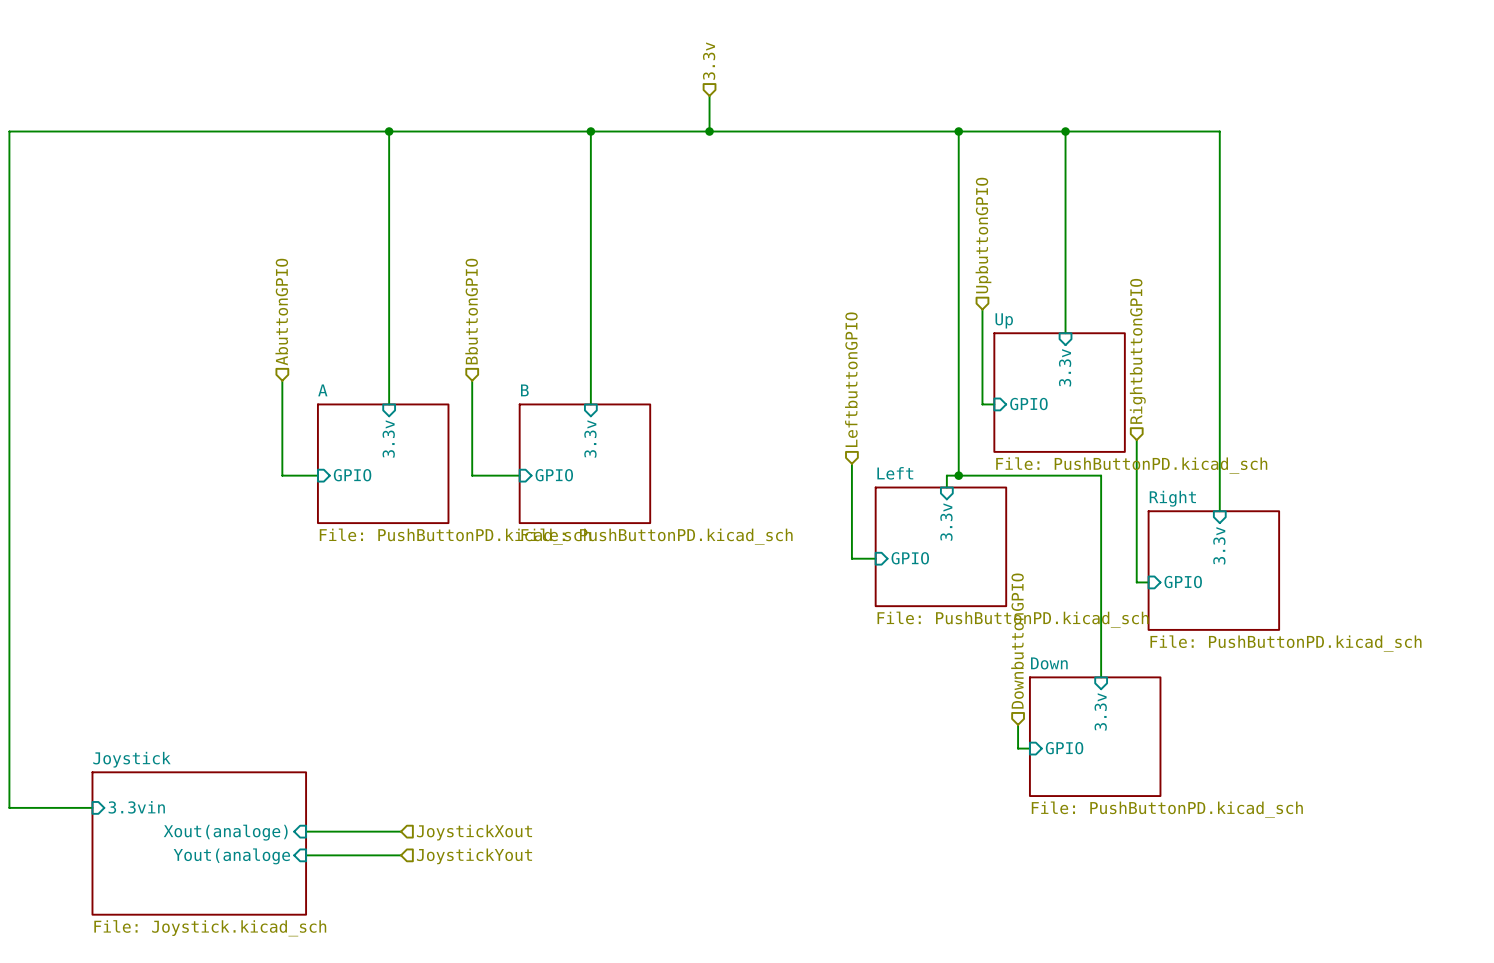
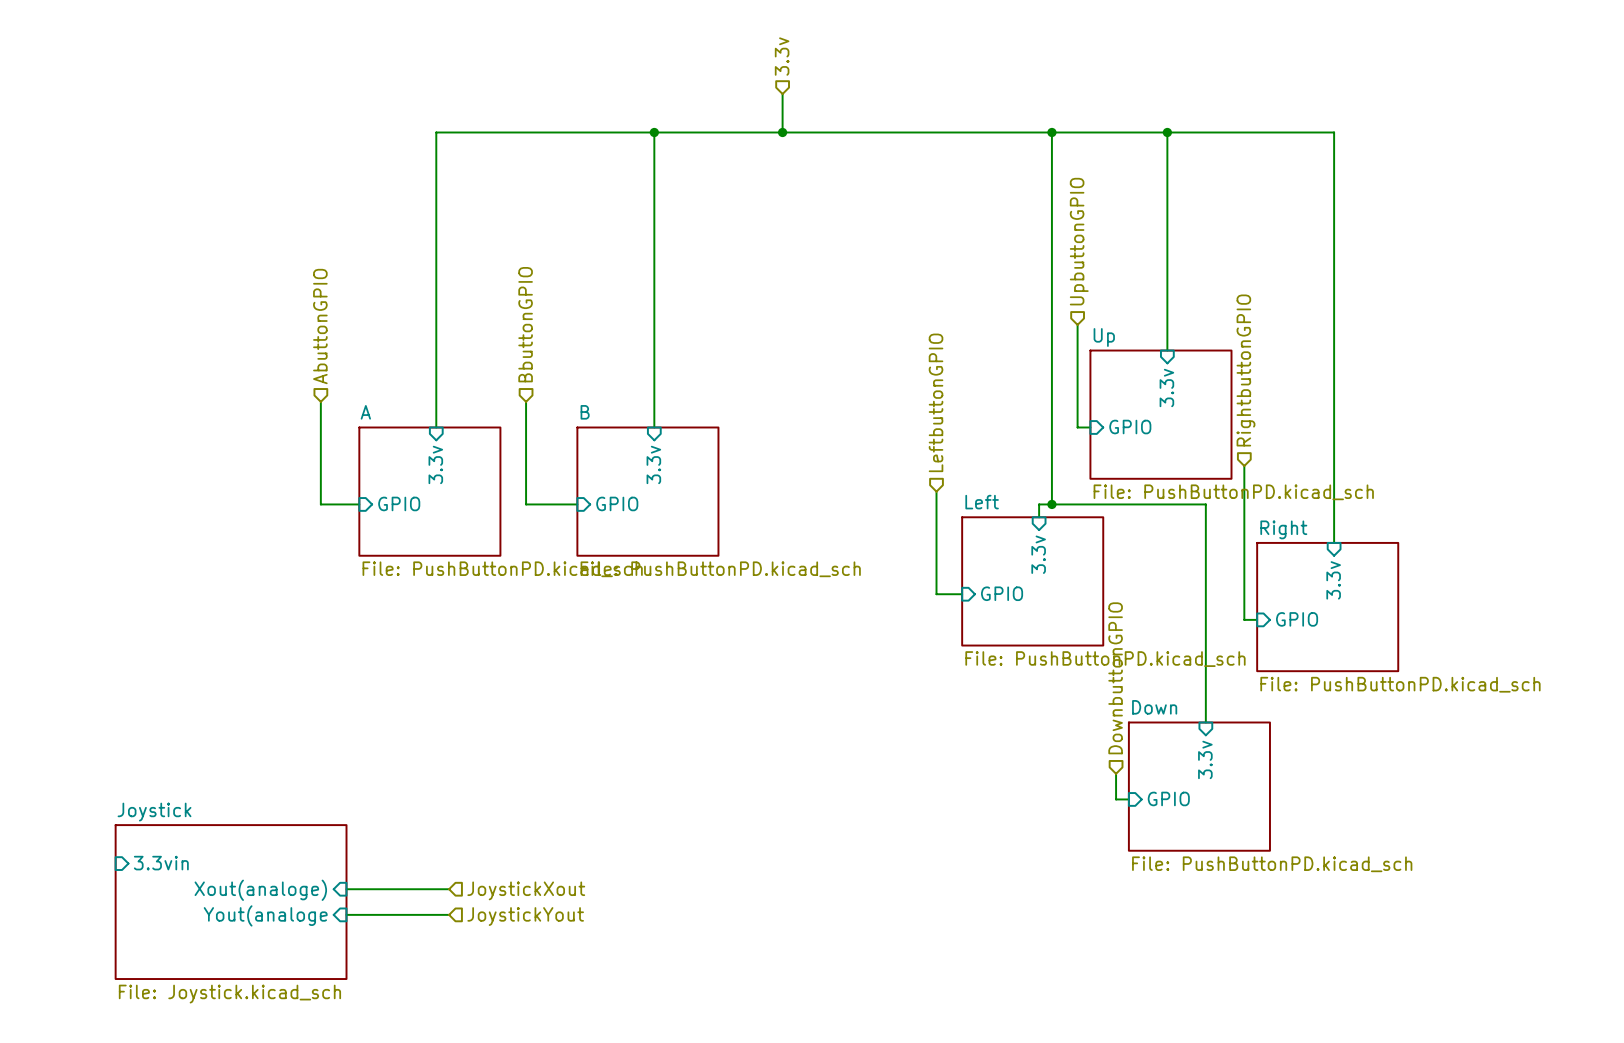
wire: (389, 131) (9, 131) (9, 807) (92, 807) -> none
junction: (389, 131) -> none

